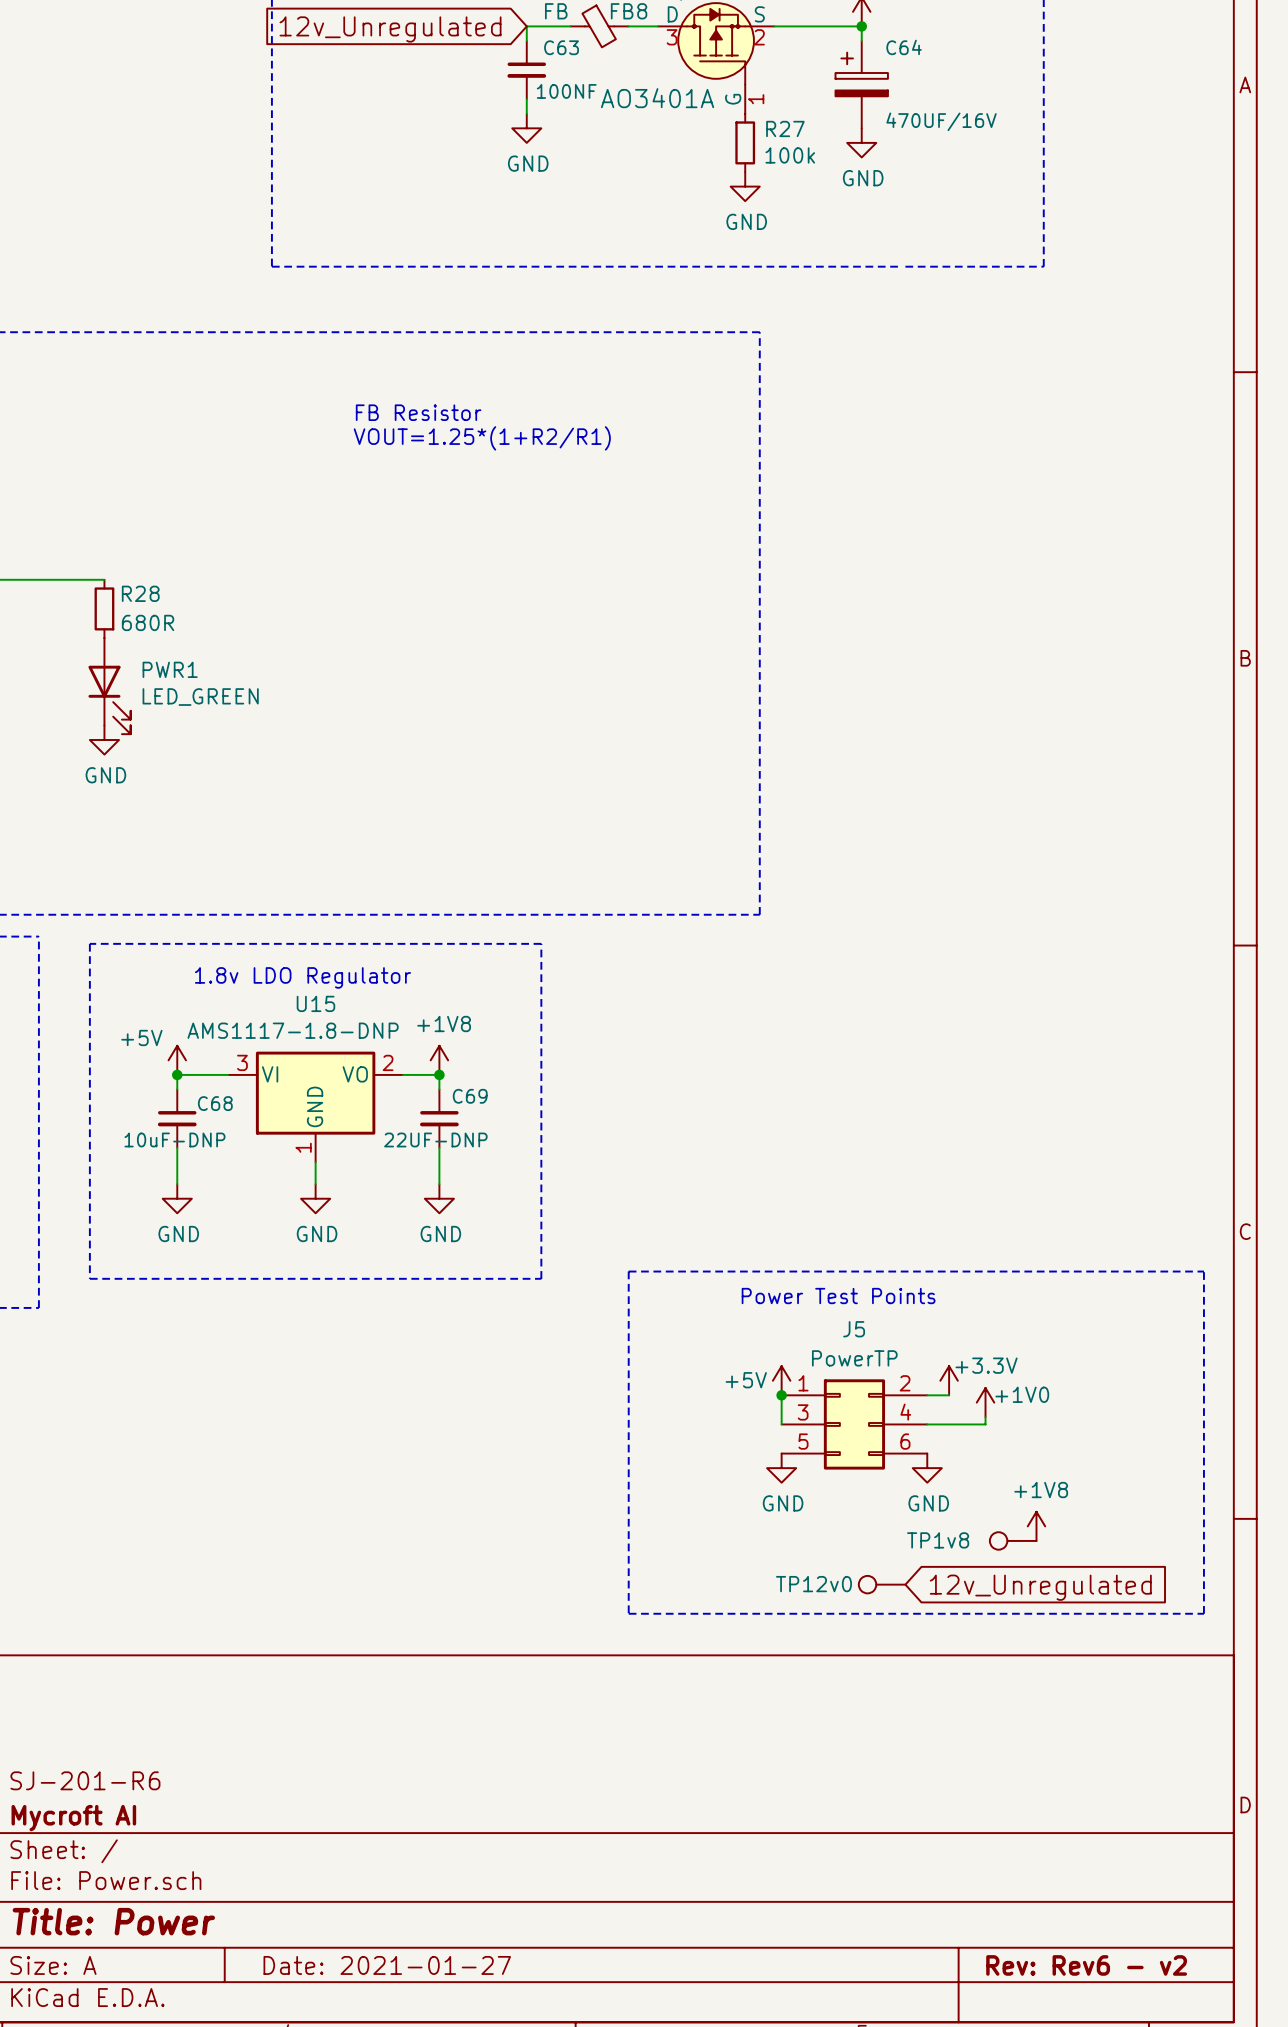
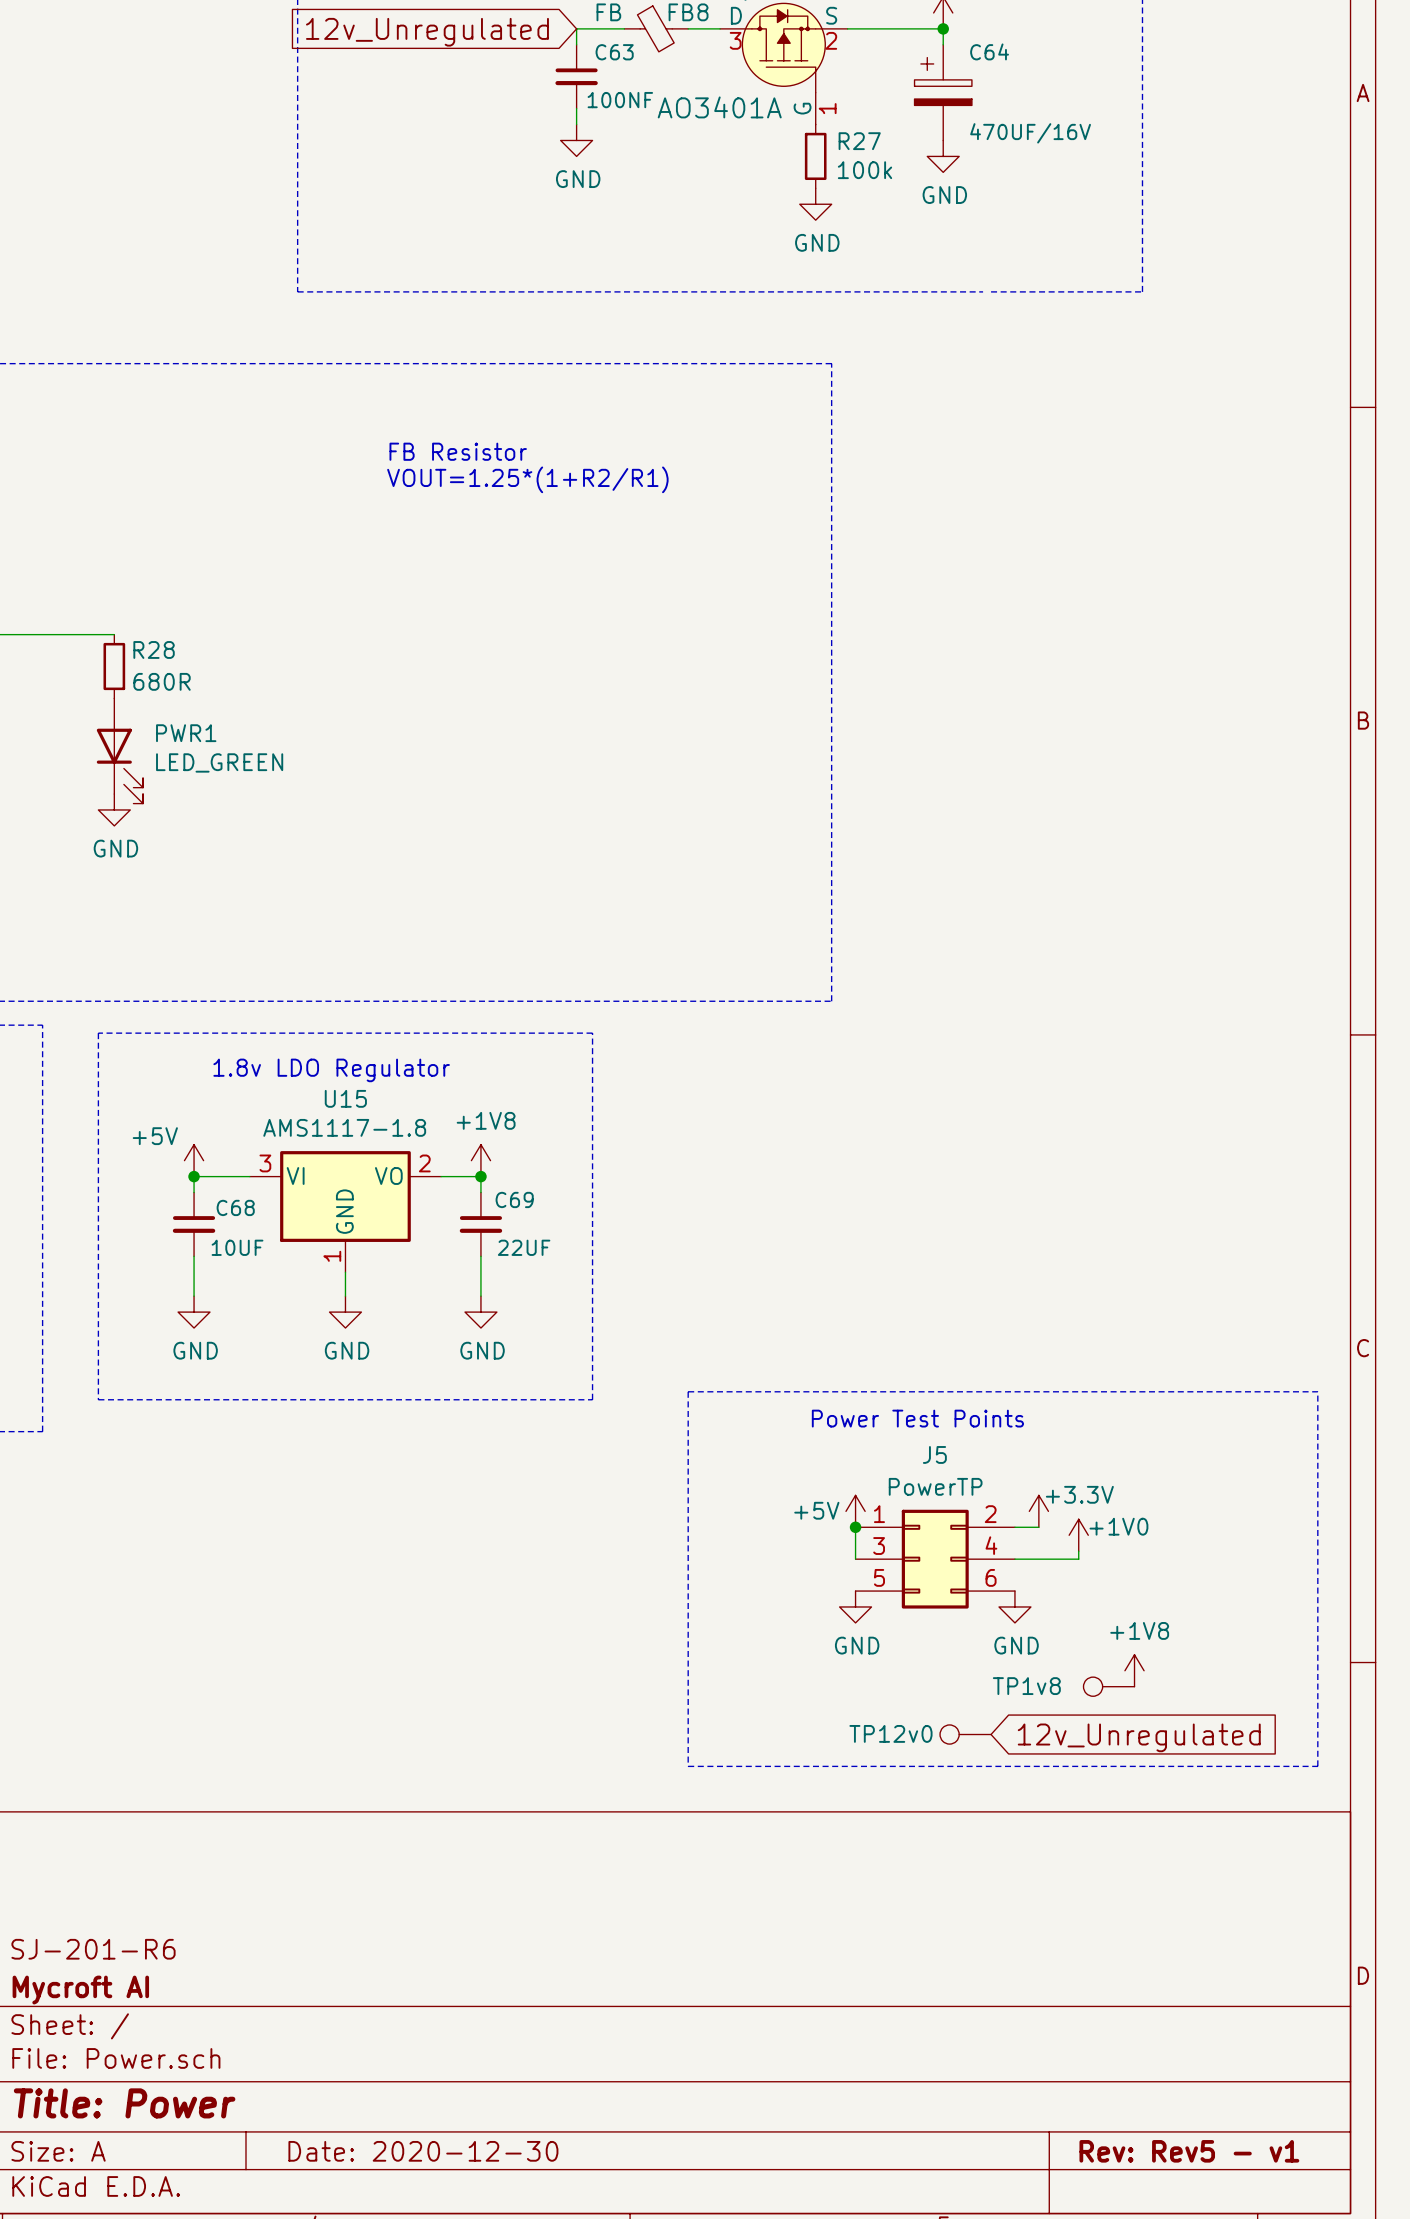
U15 value: AMS1117-1.8-DNP (293, 1030) -> AMS1117-1.8 (344, 1127)
C68 value: 10uF-DNP (174, 1139) -> 10UF (237, 1247)
C69 value: 22UF-DNP (435, 1139) -> 22UF (524, 1247)
title block: Date: 2021-01-27 (387, 1965) -> Date: 2020-12-30 (423, 2151)
title block: Rev: Rev6 - v2 (1086, 1965) -> Rev: Rev5 - v1 (1189, 2151)

